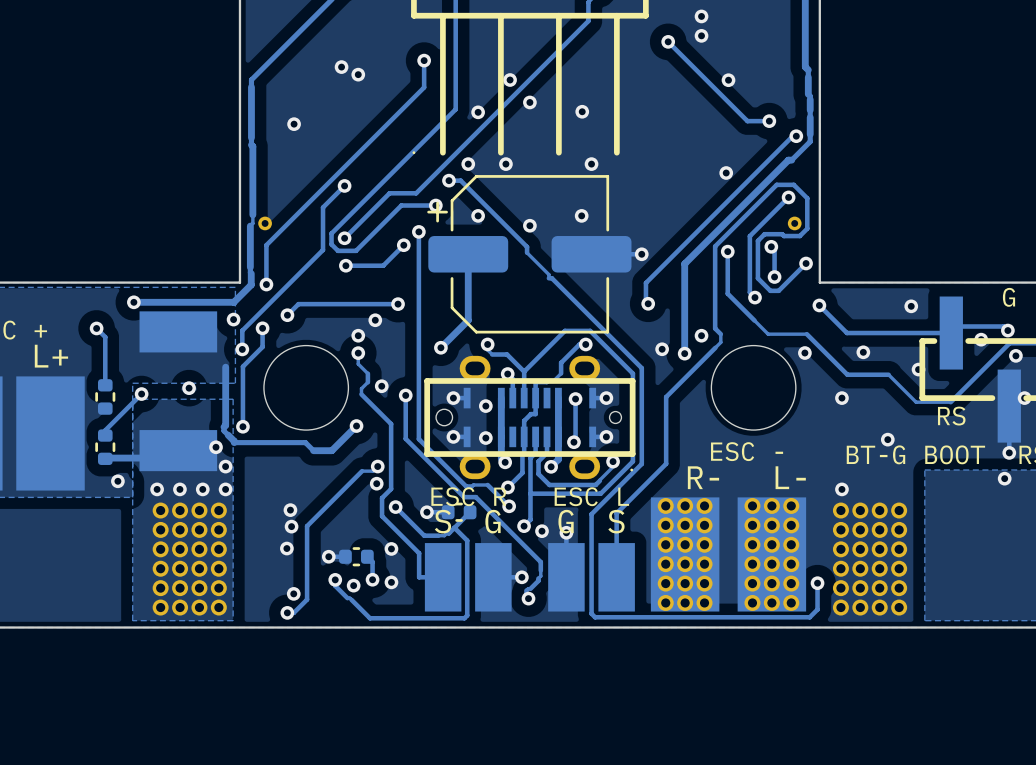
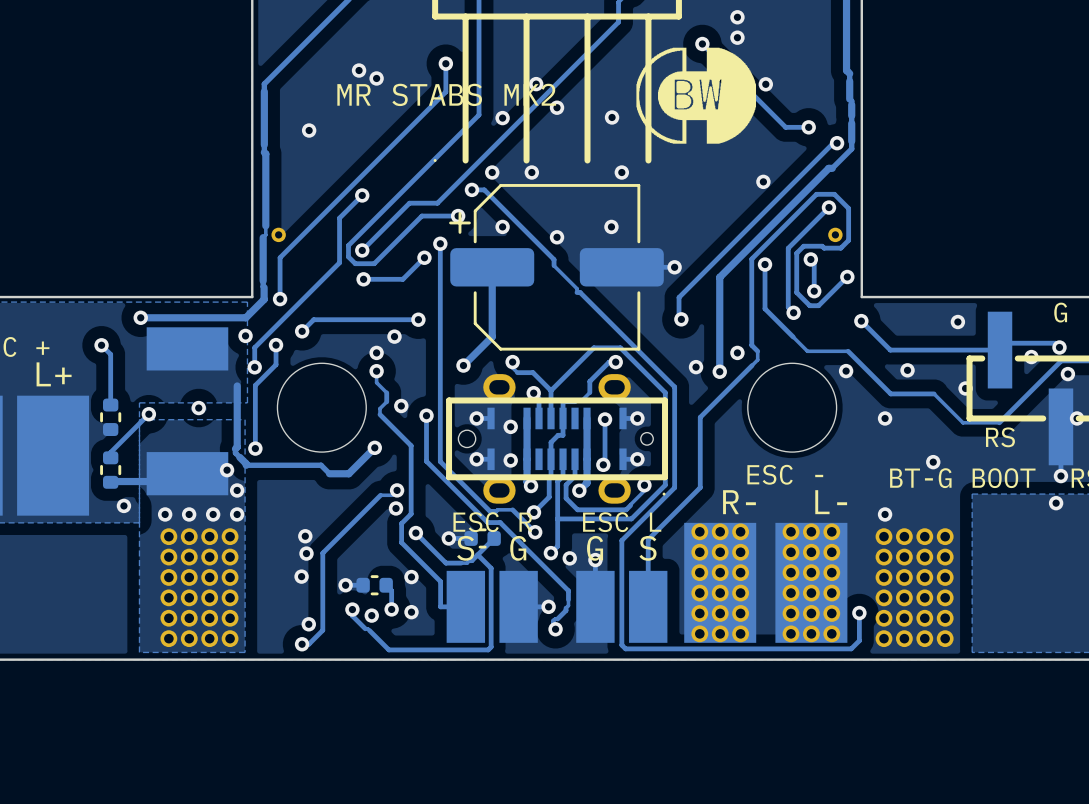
drawing: none -> [636, 47, 757, 144]
text: none -> MR STABS MK2 (446, 94)

